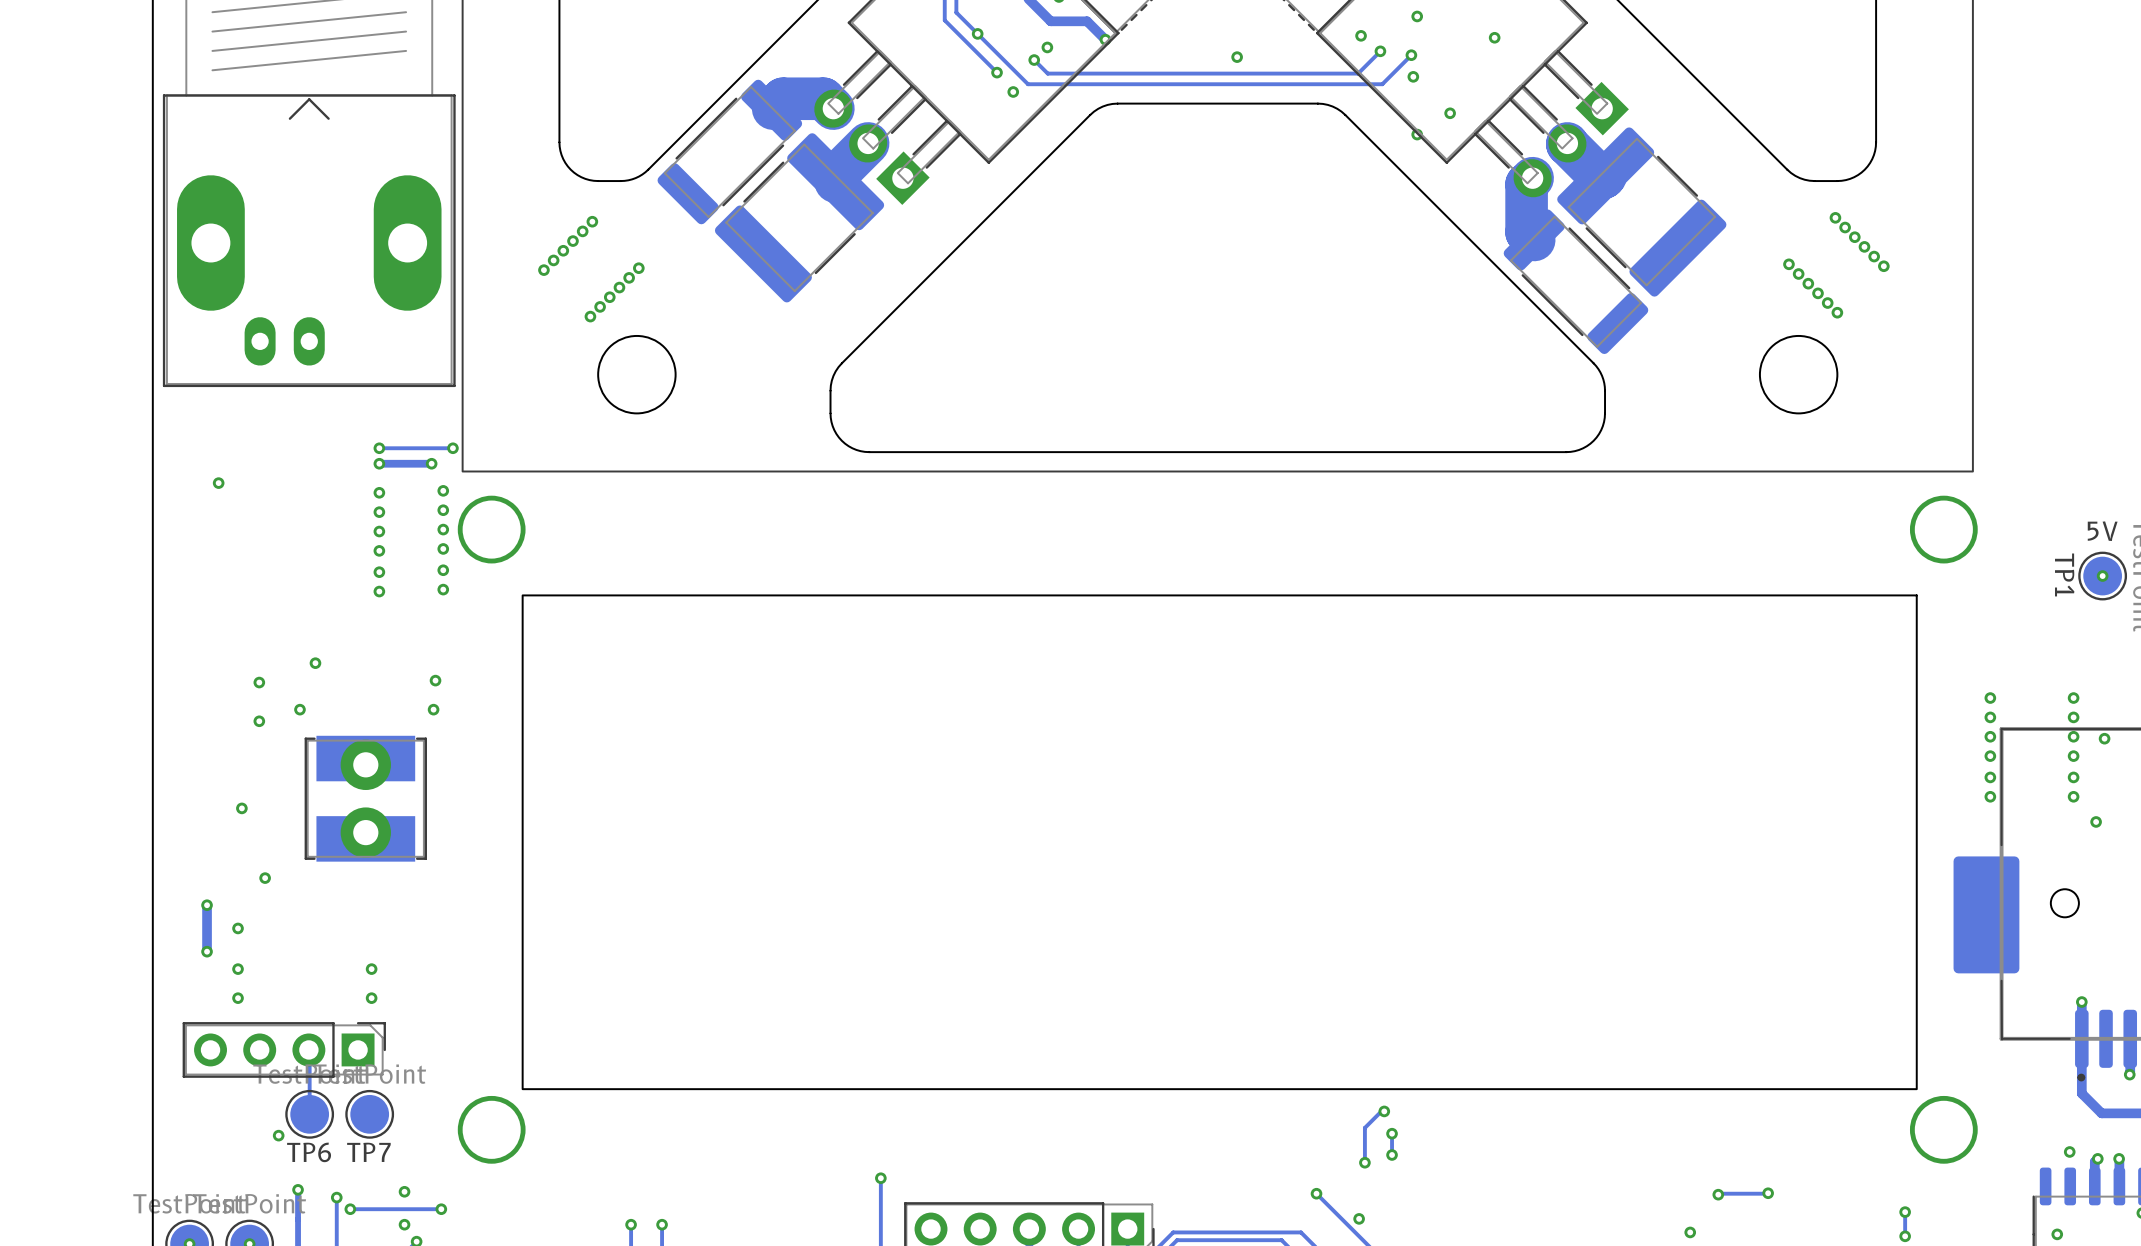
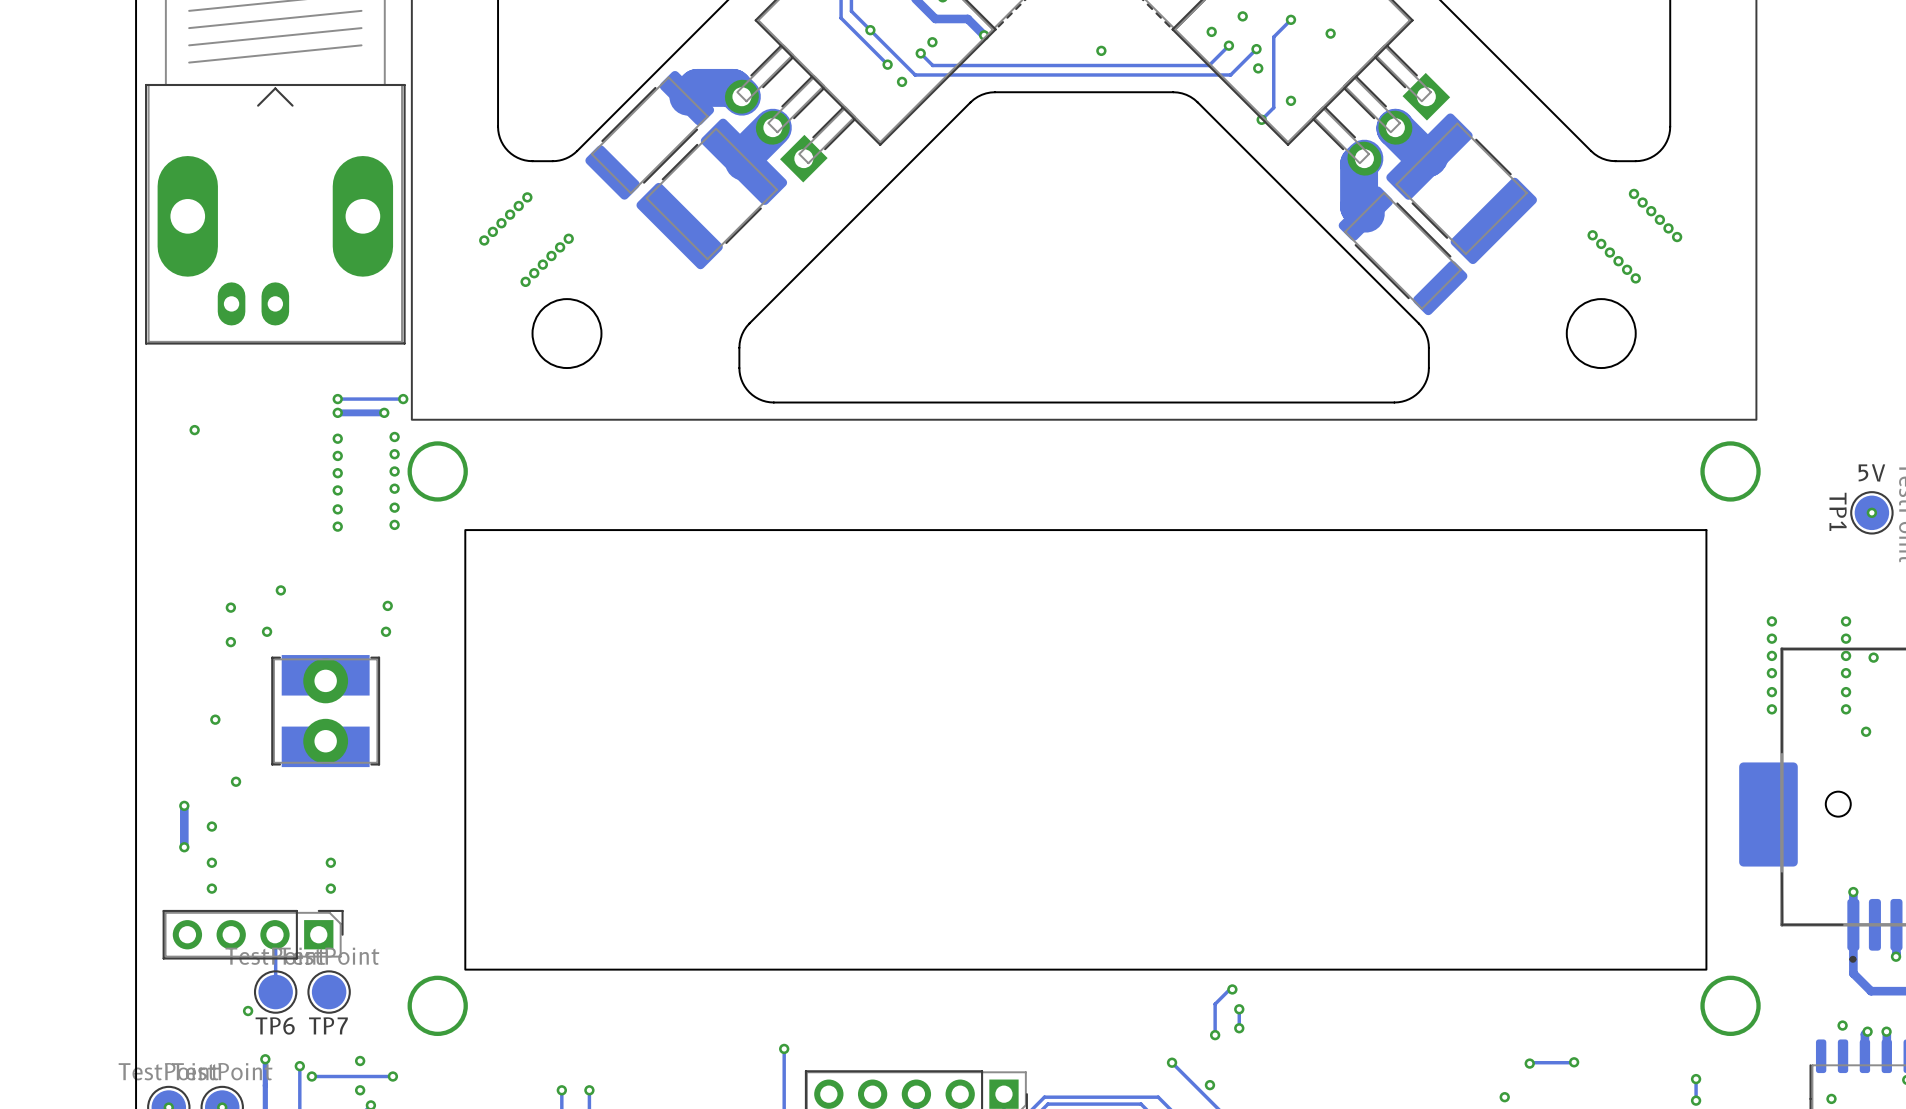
via: (1417, 16) -> none
via: none -> (1242, 16)
track: none -> (1290, 19) (1273, 37) (1273, 107) (1261, 119)
via: none -> (1290, 19)

